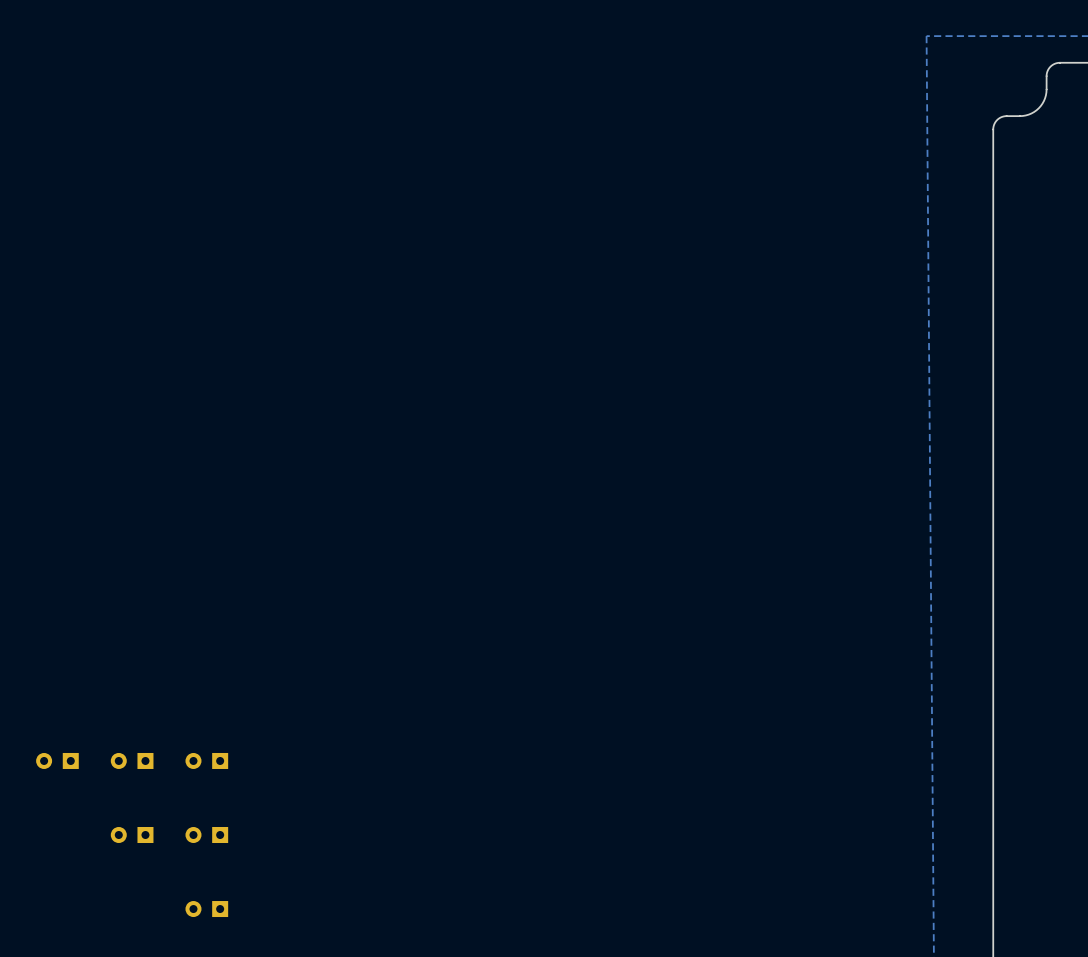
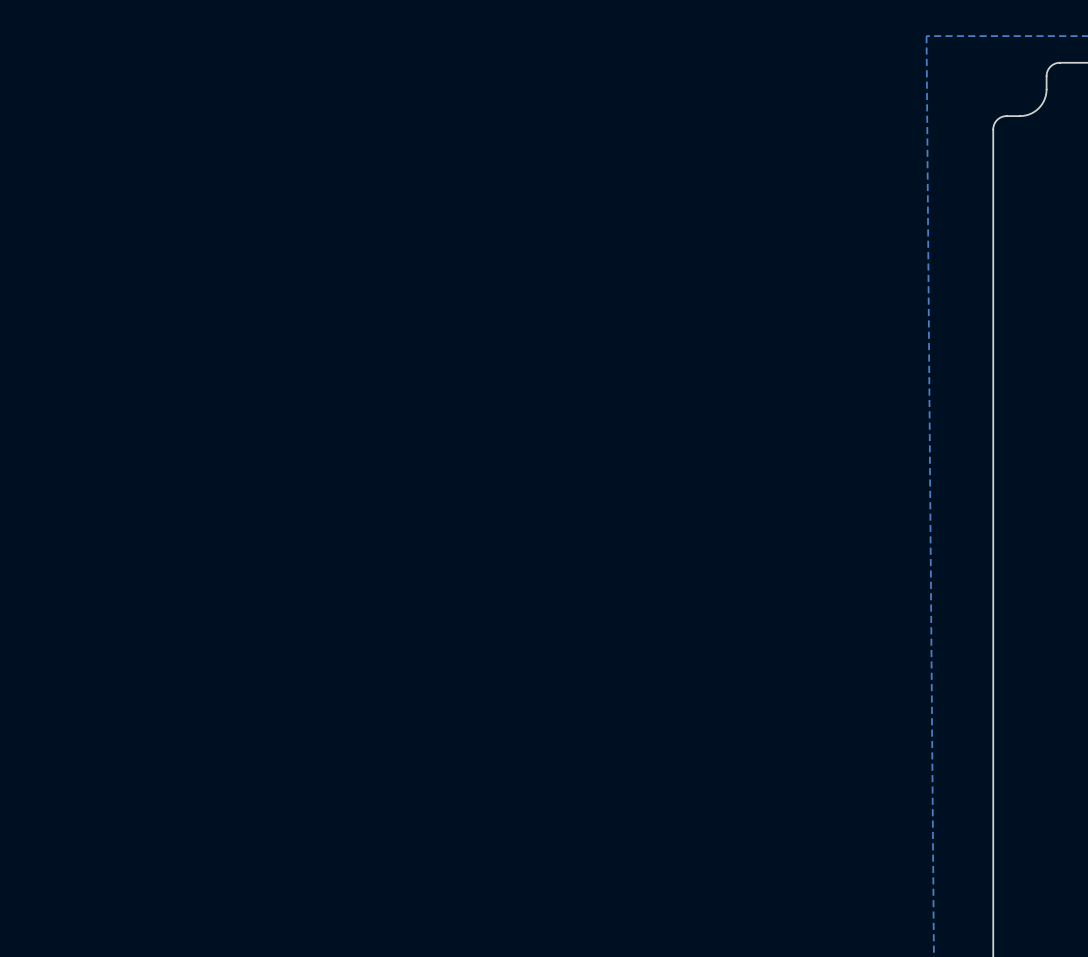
part: (57, 760) -> none
part: (132, 760) -> none
part: (206, 760) -> none
part: (132, 835) -> none
part: (206, 835) -> none
part: (206, 909) -> none

